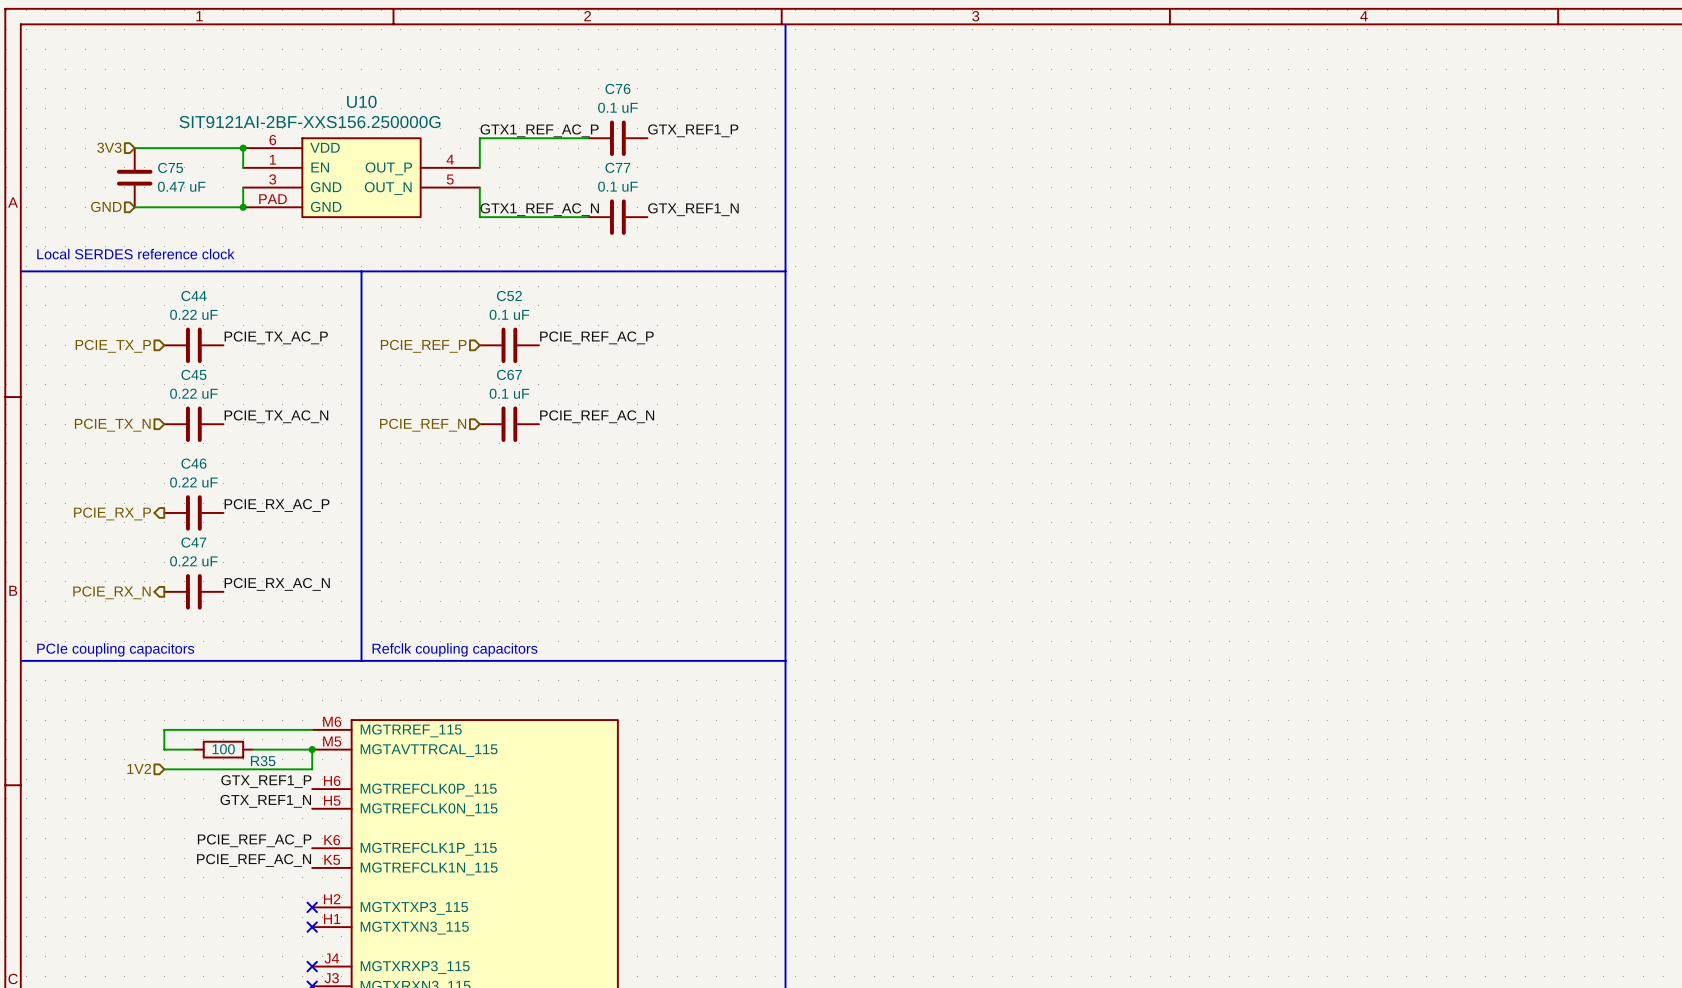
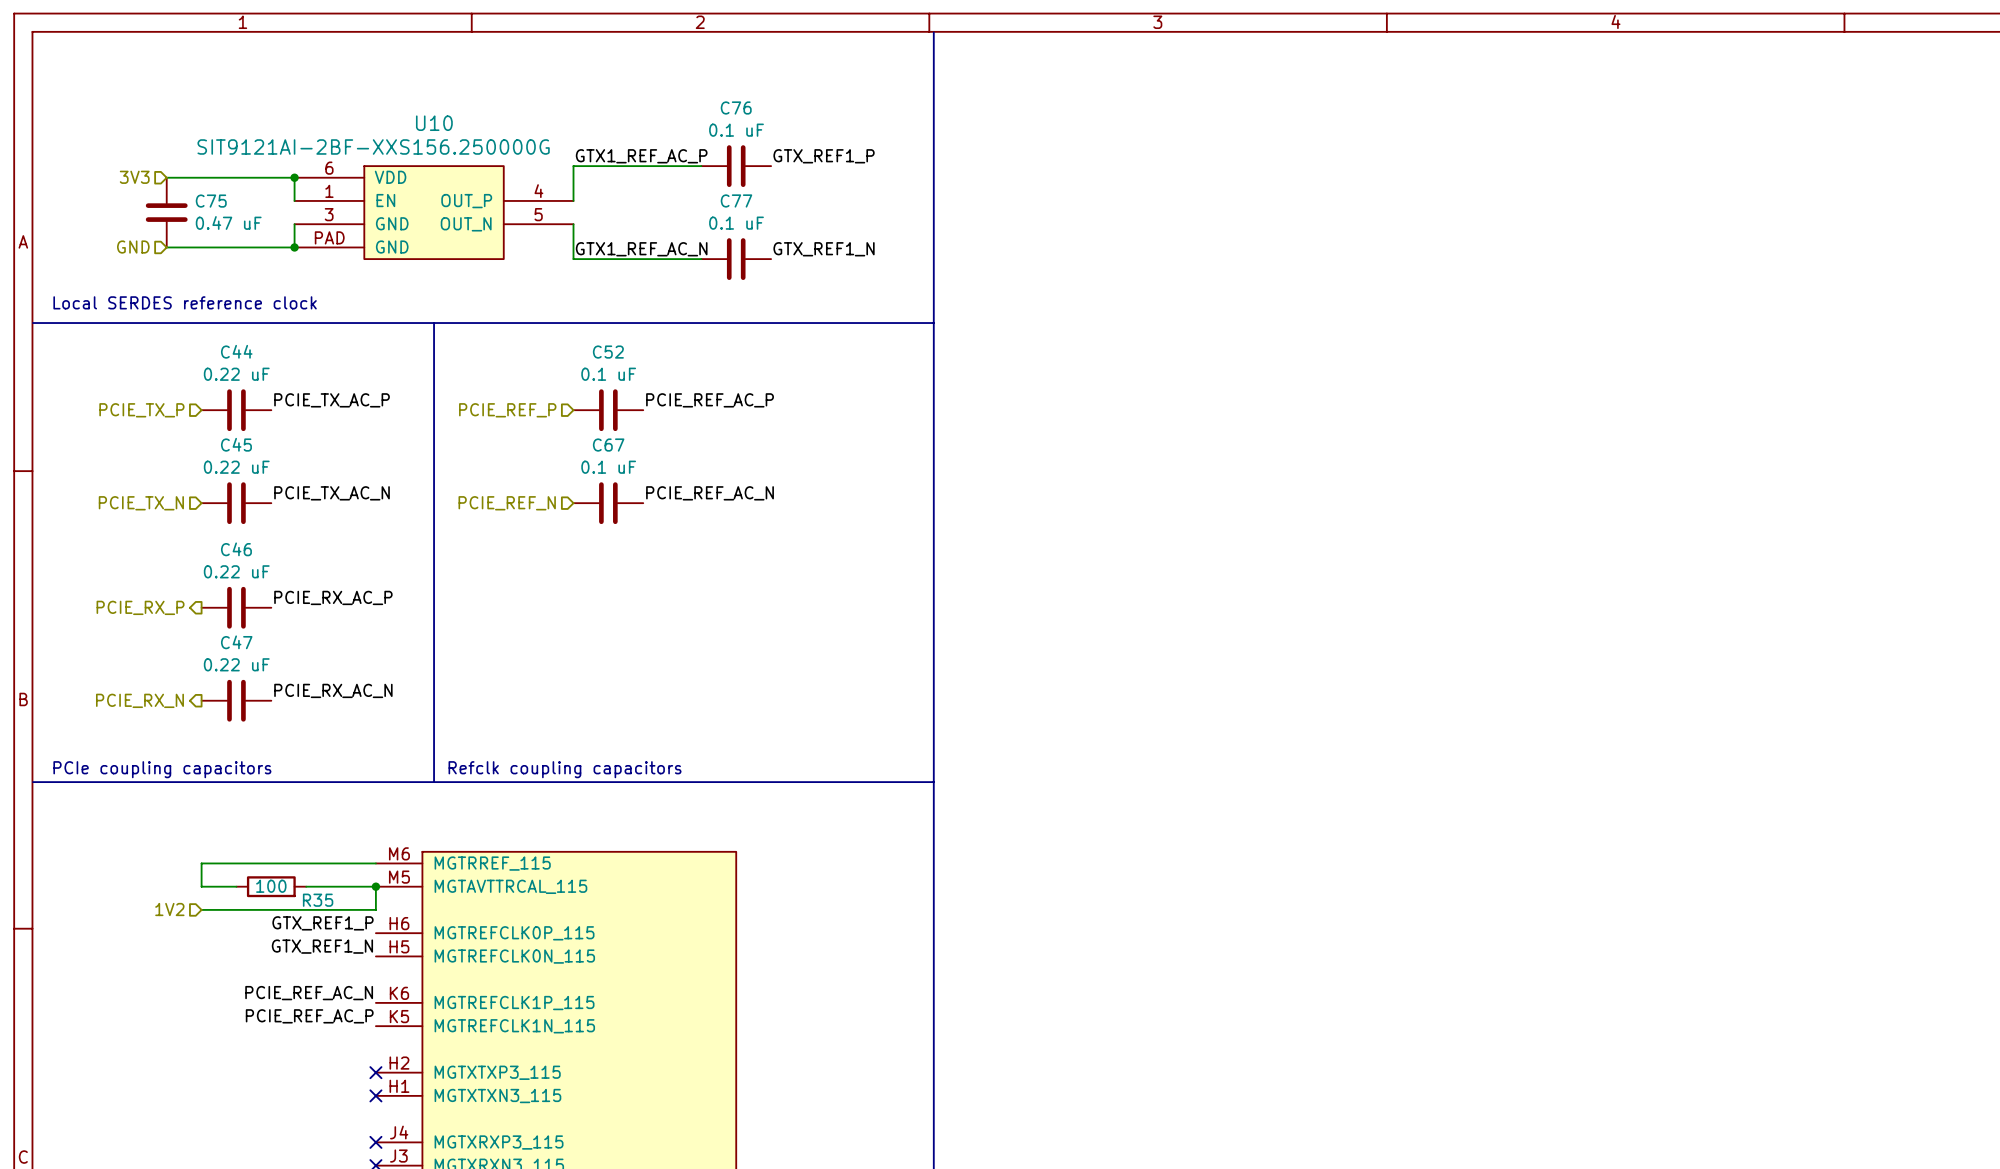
label: PCIE_REF_AC_P (254, 840) -> PCIE_REF_AC_N (309, 993)
label: PCIE_REF_AC_N (254, 860) -> PCIE_REF_AC_P (309, 1016)

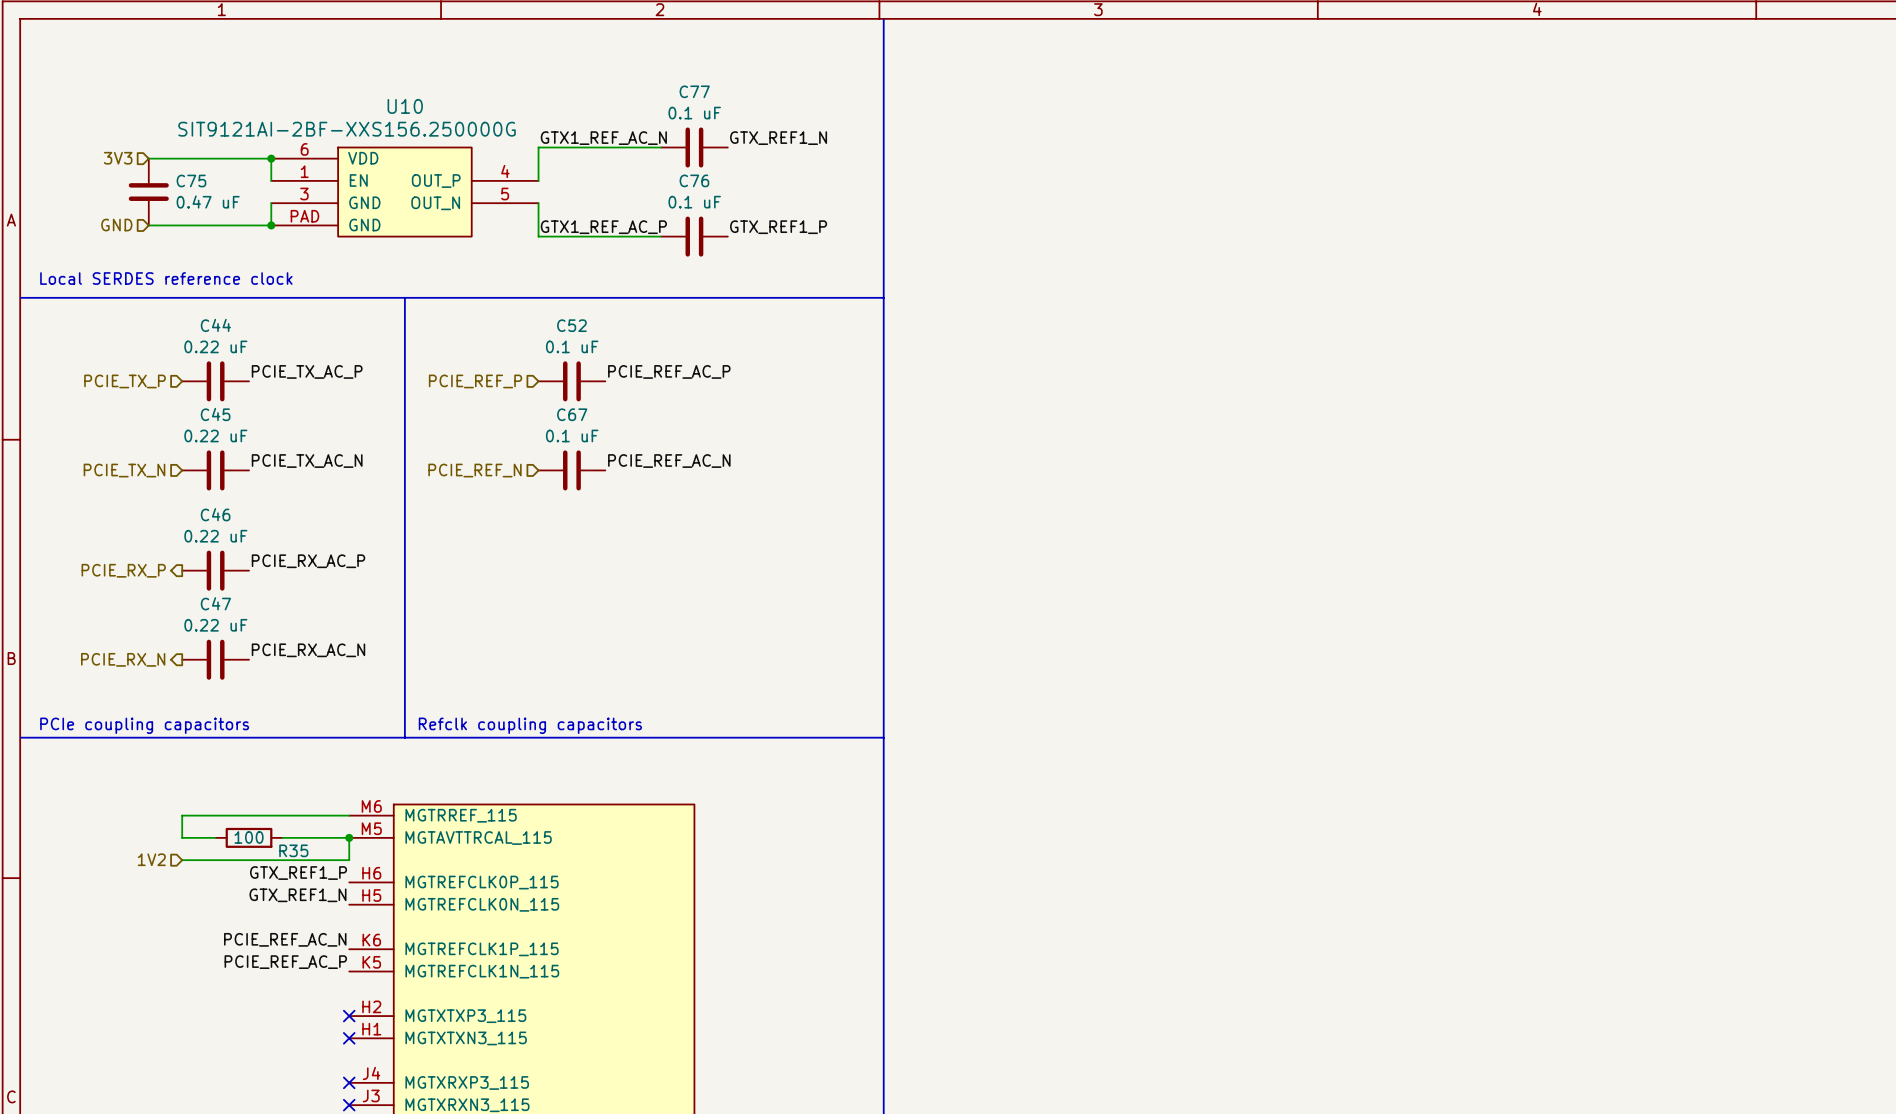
C76 name: C76 (736, 107) -> C77 (694, 91)
label: GTX1_REF_AC_P (641, 156) -> GTX1_REF_AC_N (603, 138)
label: GTX_REF1_P (824, 156) -> GTX_REF1_N (778, 138)
C77 name: C77 (736, 200) -> C76 (694, 180)
label: GTX1_REF_AC_N (641, 249) -> GTX1_REF_AC_P (603, 227)
label: GTX_REF1_N (824, 249) -> GTX_REF1_P (778, 227)

